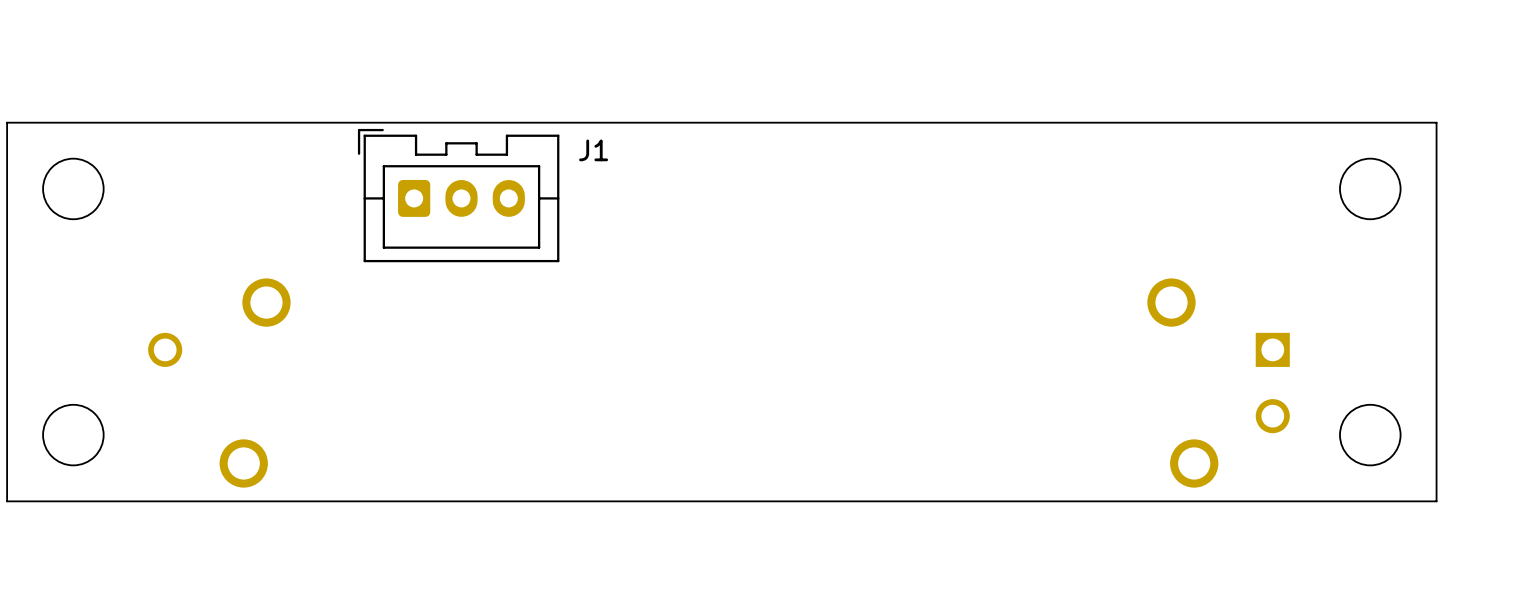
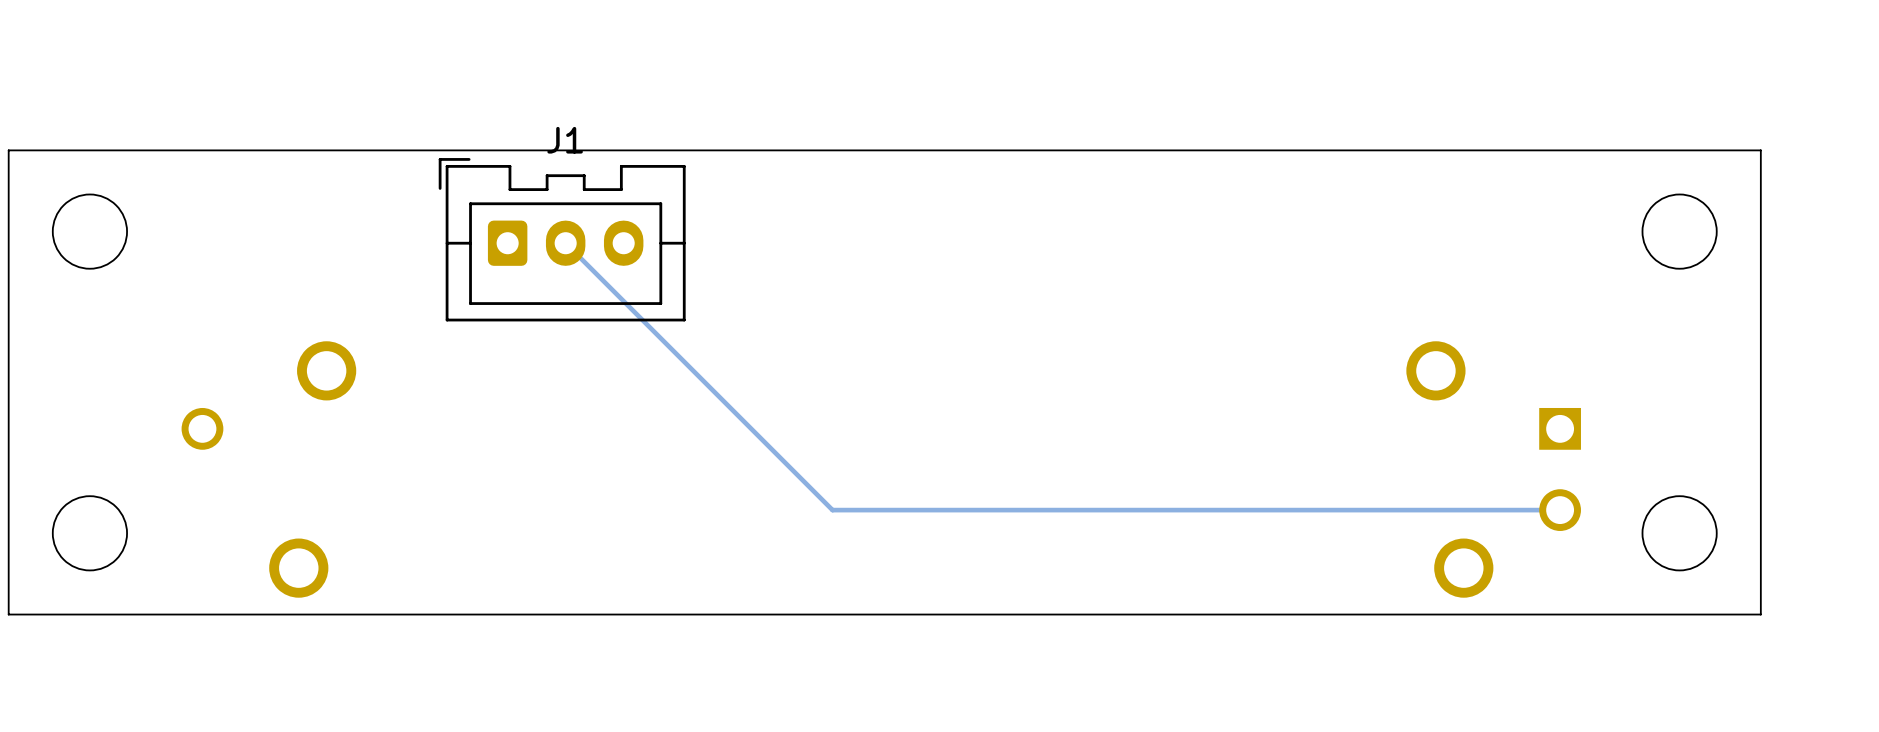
J1 name position: J1 (593, 150) -> J1 (565, 140)
track: none -> (565, 243) (832, 510) (1560, 510)

